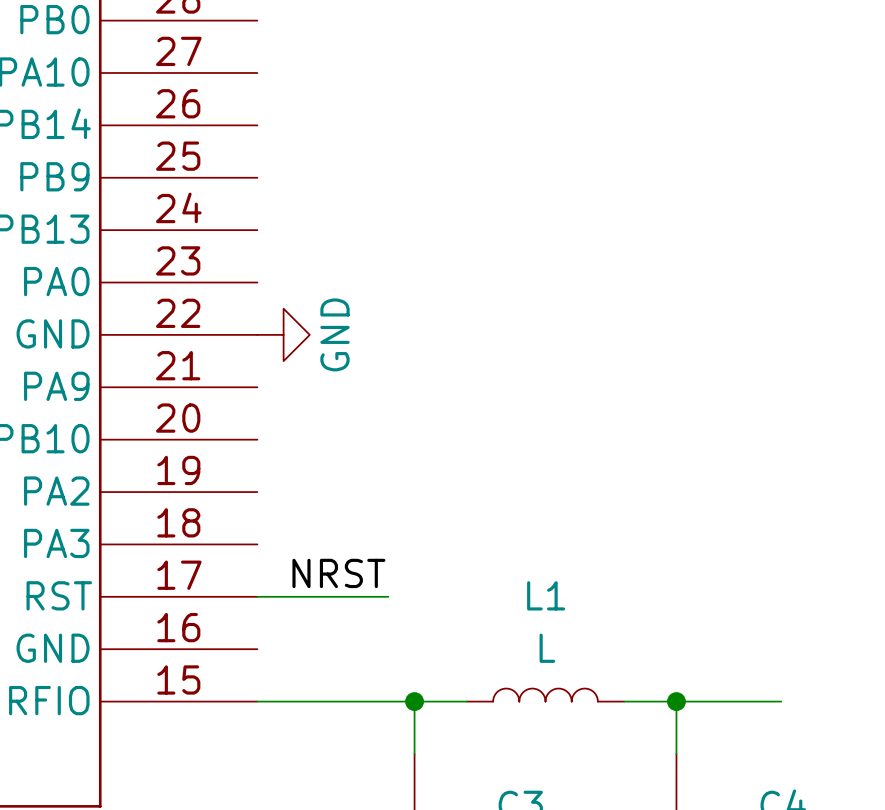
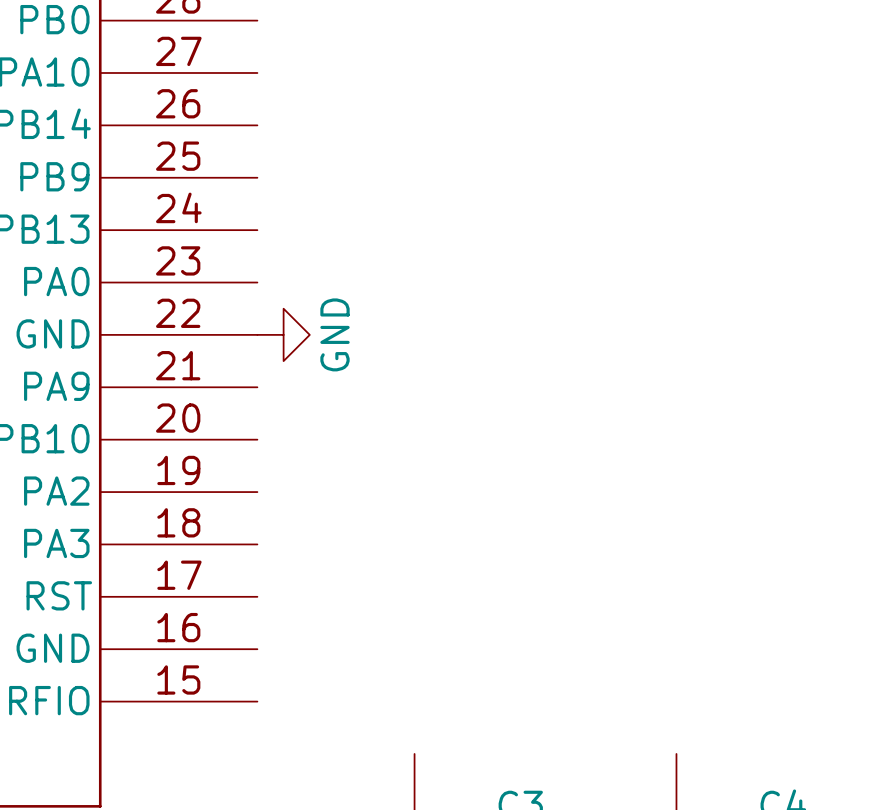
label: NRST (338, 573) -> none
wire: (257, 596) (388, 596) -> none
L1: L (545, 695) -> none
wire: (257, 701) (466, 701) -> none
wire: (414, 701) (414, 753) -> none
junction: (414, 701) -> none
wire: (624, 701) (781, 701) -> none
wire: (676, 701) (676, 753) -> none
junction: (676, 701) -> none

